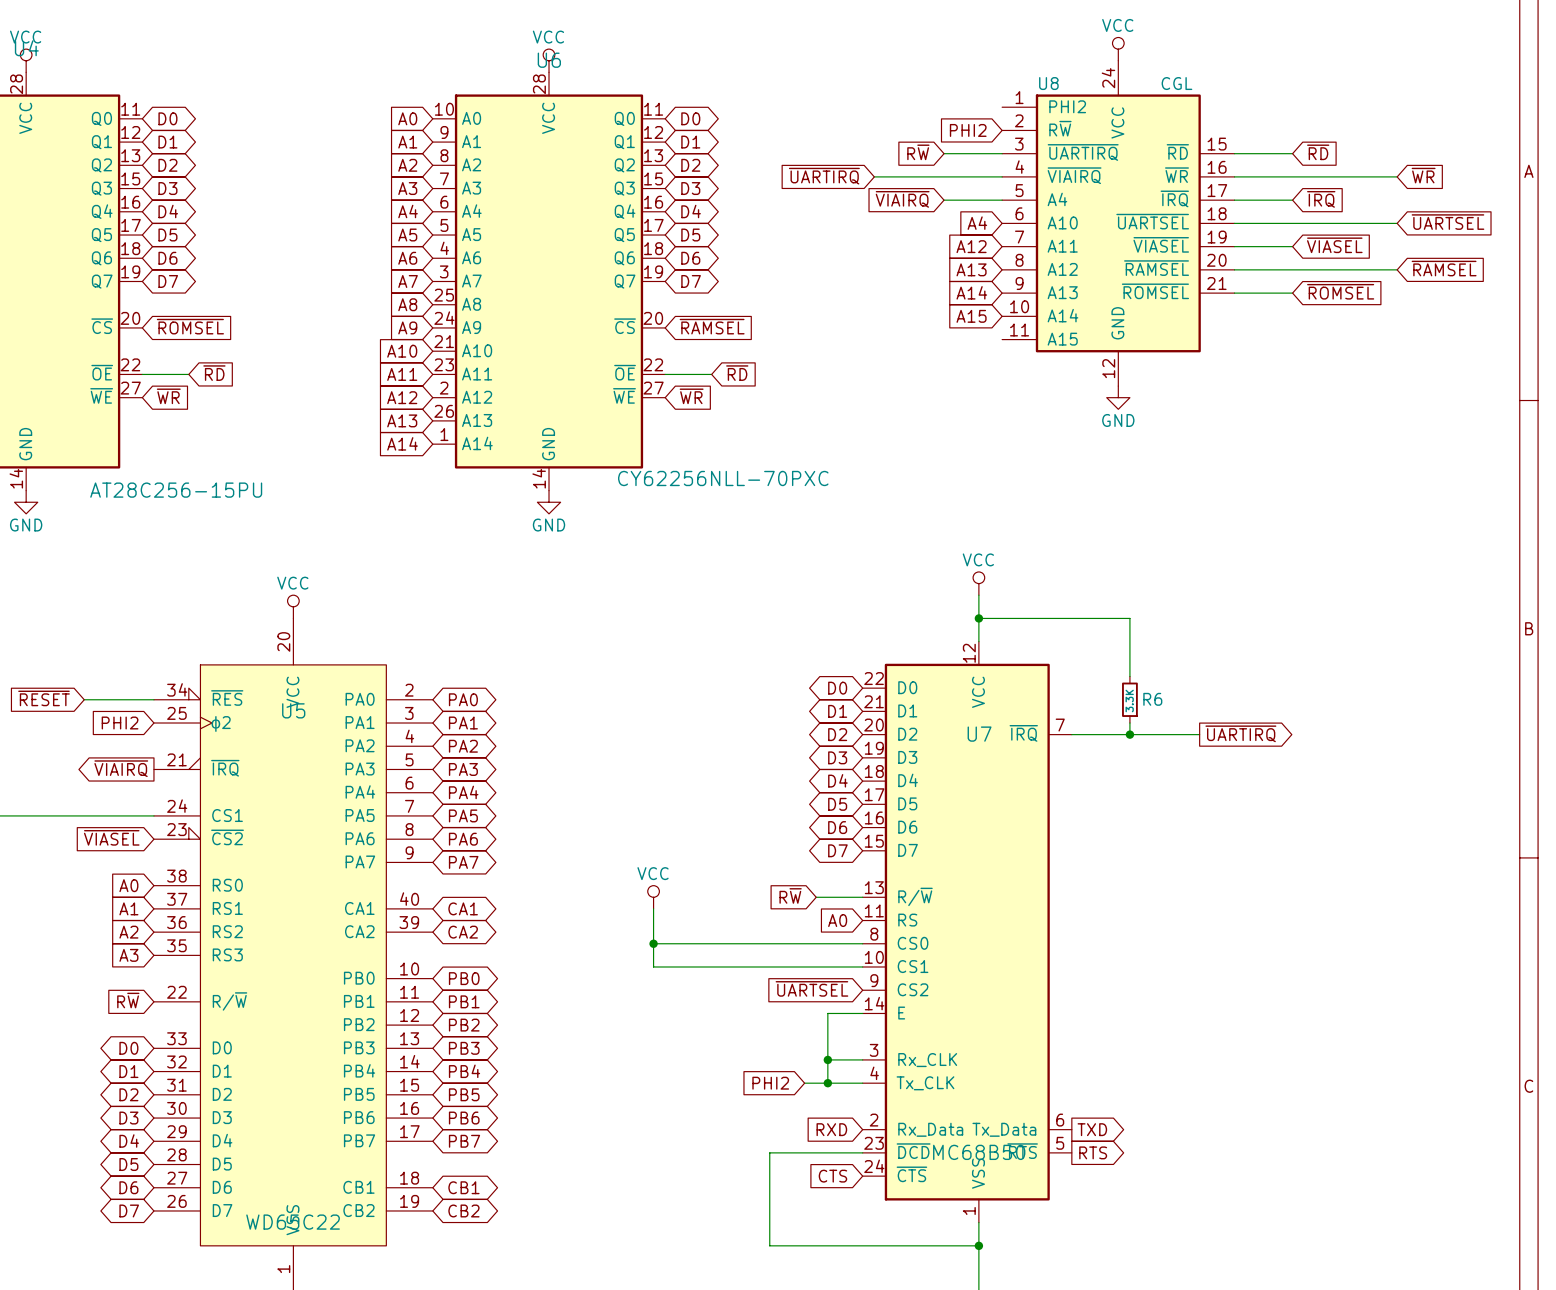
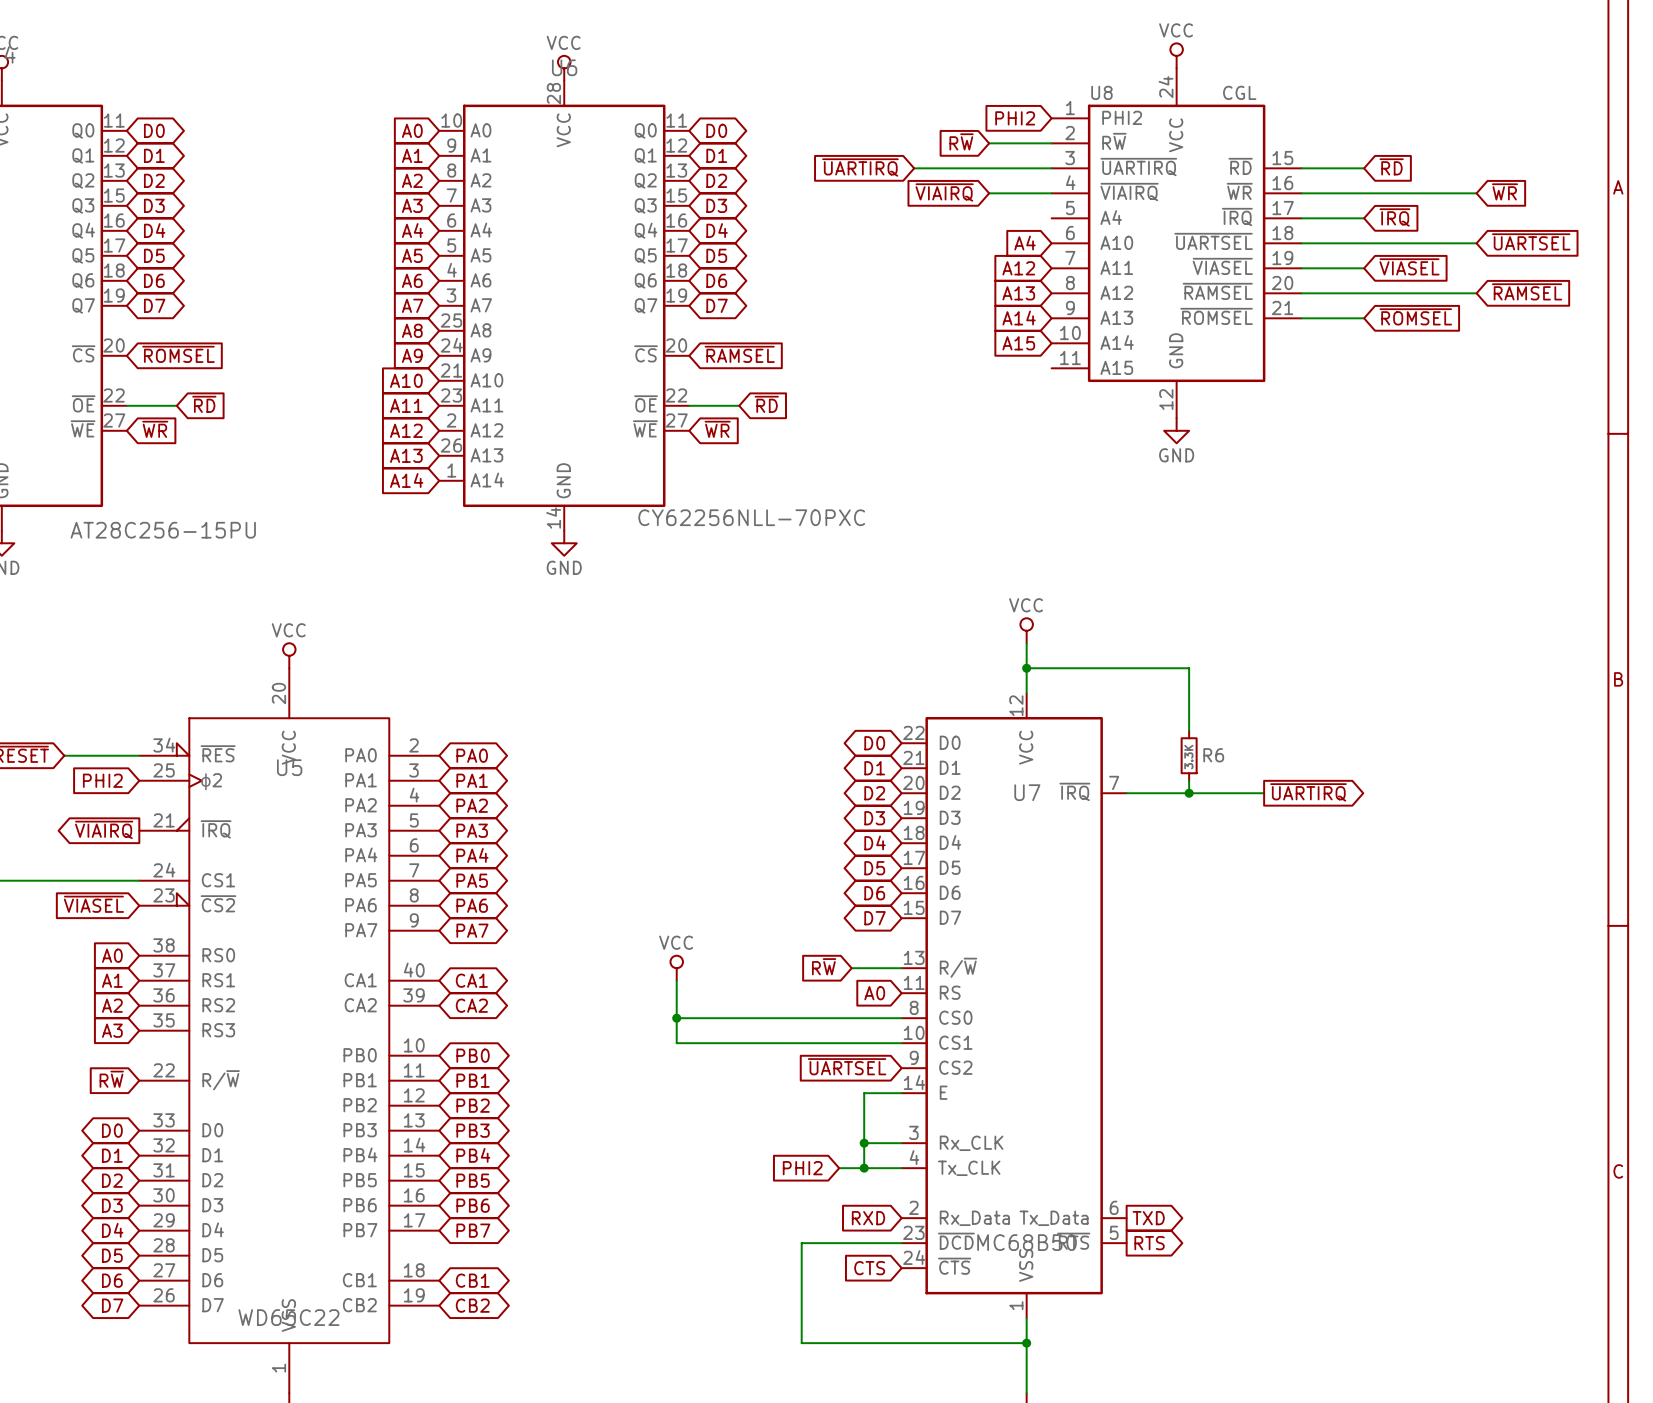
global label position: PHI2 (968, 130) -> PHI2 (1015, 118)
global label position: R~{W} (918, 152) -> R~{W} (961, 141)
global label position: ~{UARTIRQ} (824, 176) -> ~{UARTIRQ} (860, 167)
wire: (874, 176) (944, 176) -> (914, 168) (989, 168)
global label position: ~{VIAIRQ} (902, 199) -> ~{VIAIRQ} (944, 192)
wire: (944, 200) (1002, 200) -> (989, 143) (1051, 143)

